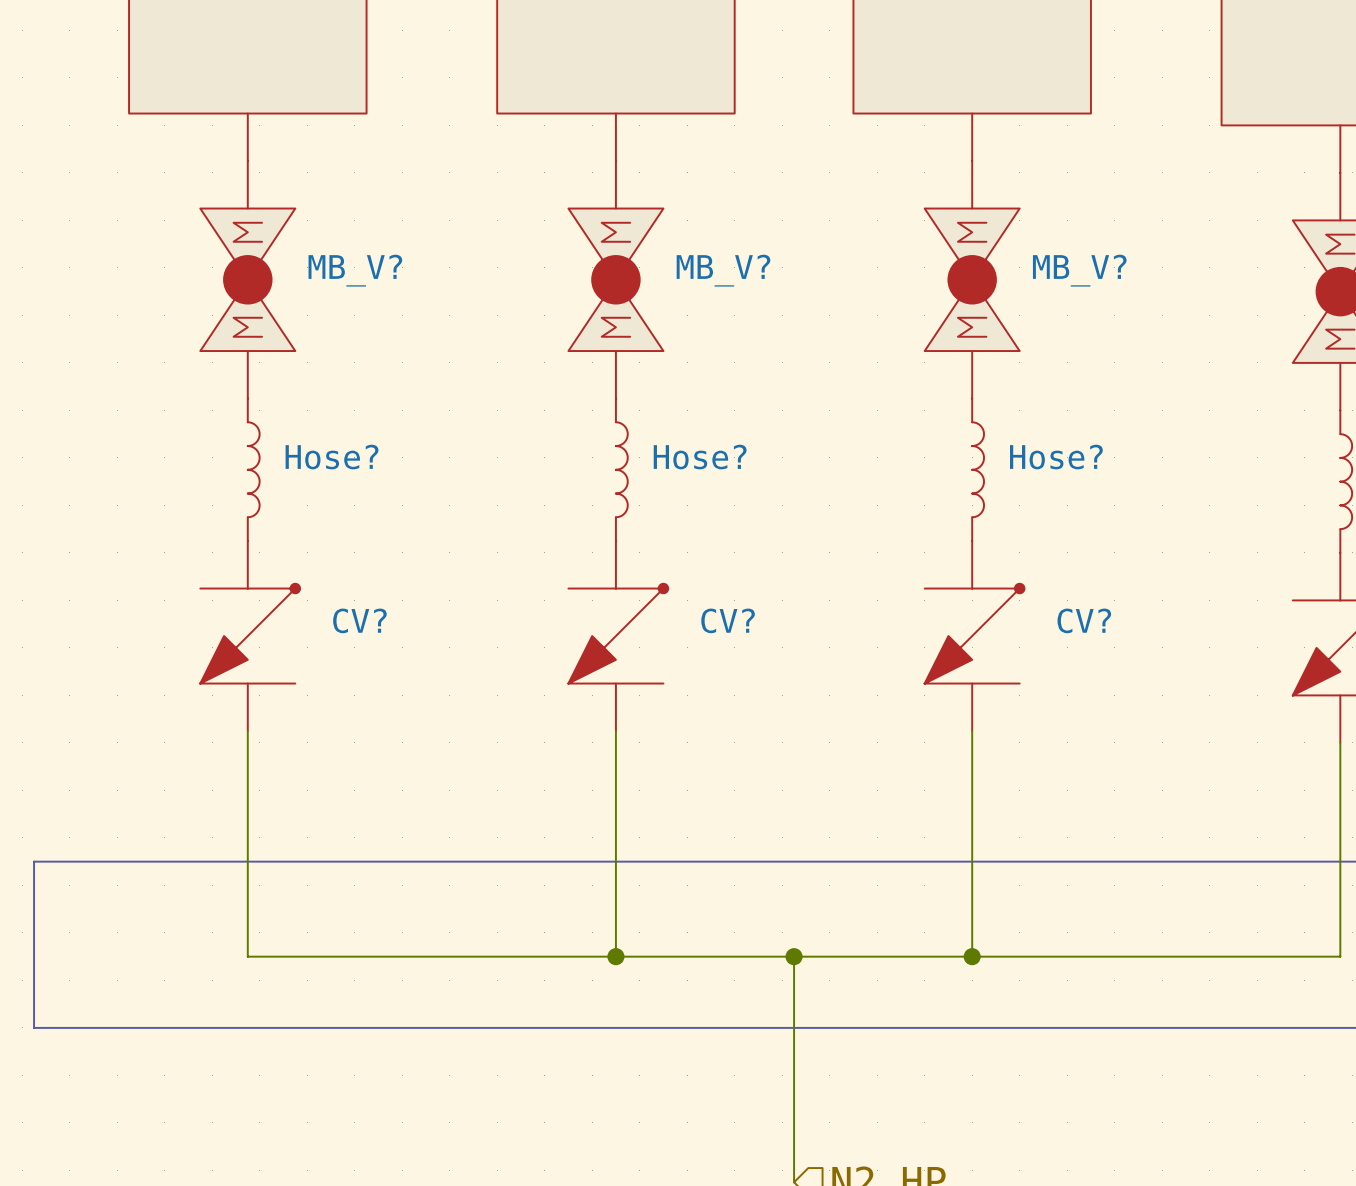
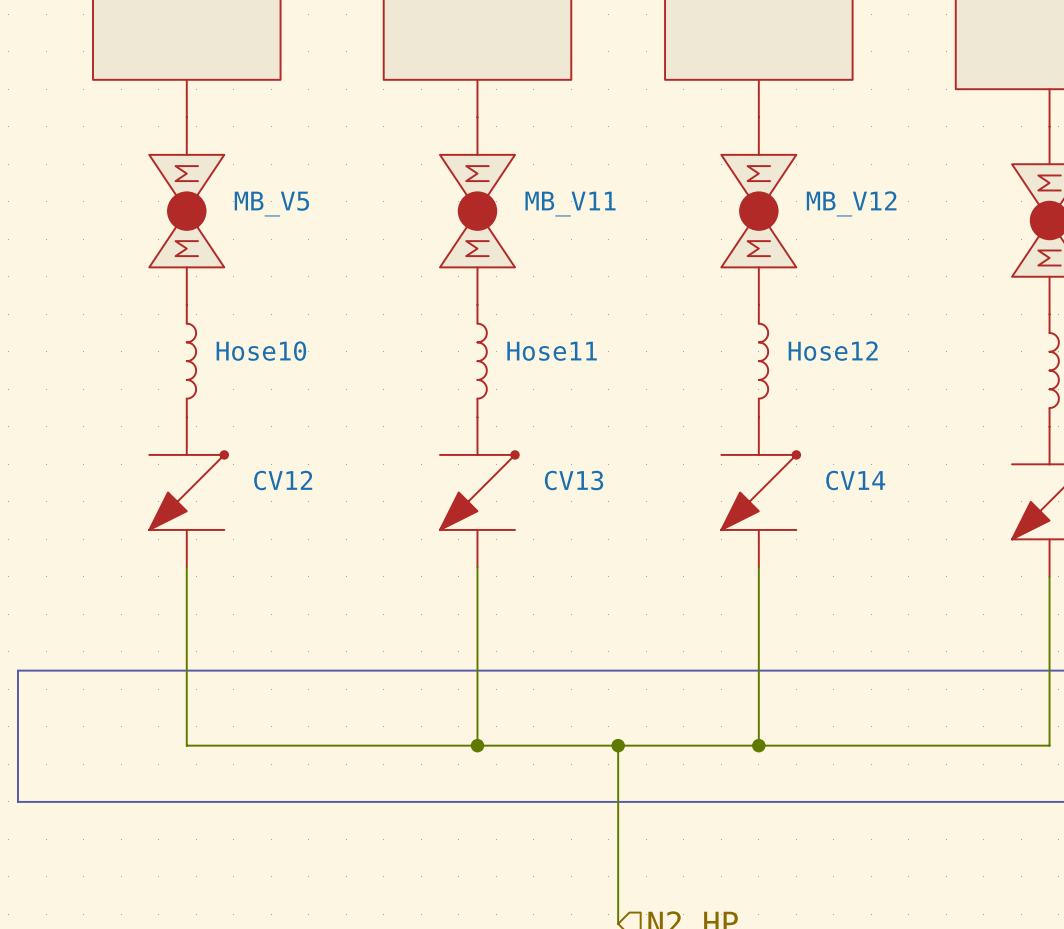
MB_V? name: MB_V? (355, 270) -> MB_V5 (271, 204)
MB_V? name: MB_V? (723, 270) -> MB_V11 (570, 204)
MB_V? name: MB_V? (1079, 270) -> MB_V12 (851, 203)
Hose? name: Hose? (332, 457) -> Hose10 (261, 351)
Hose? name: Hose? (700, 457) -> Hose11 (552, 351)
Hose? name: Hose? (1056, 457) -> Hose12 (833, 351)
CV? name: CV? (359, 620) -> CV12 (283, 480)
CV? name: CV? (728, 620) -> CV13 (574, 480)
CV? name: CV? (1084, 620) -> CV14 (855, 480)

